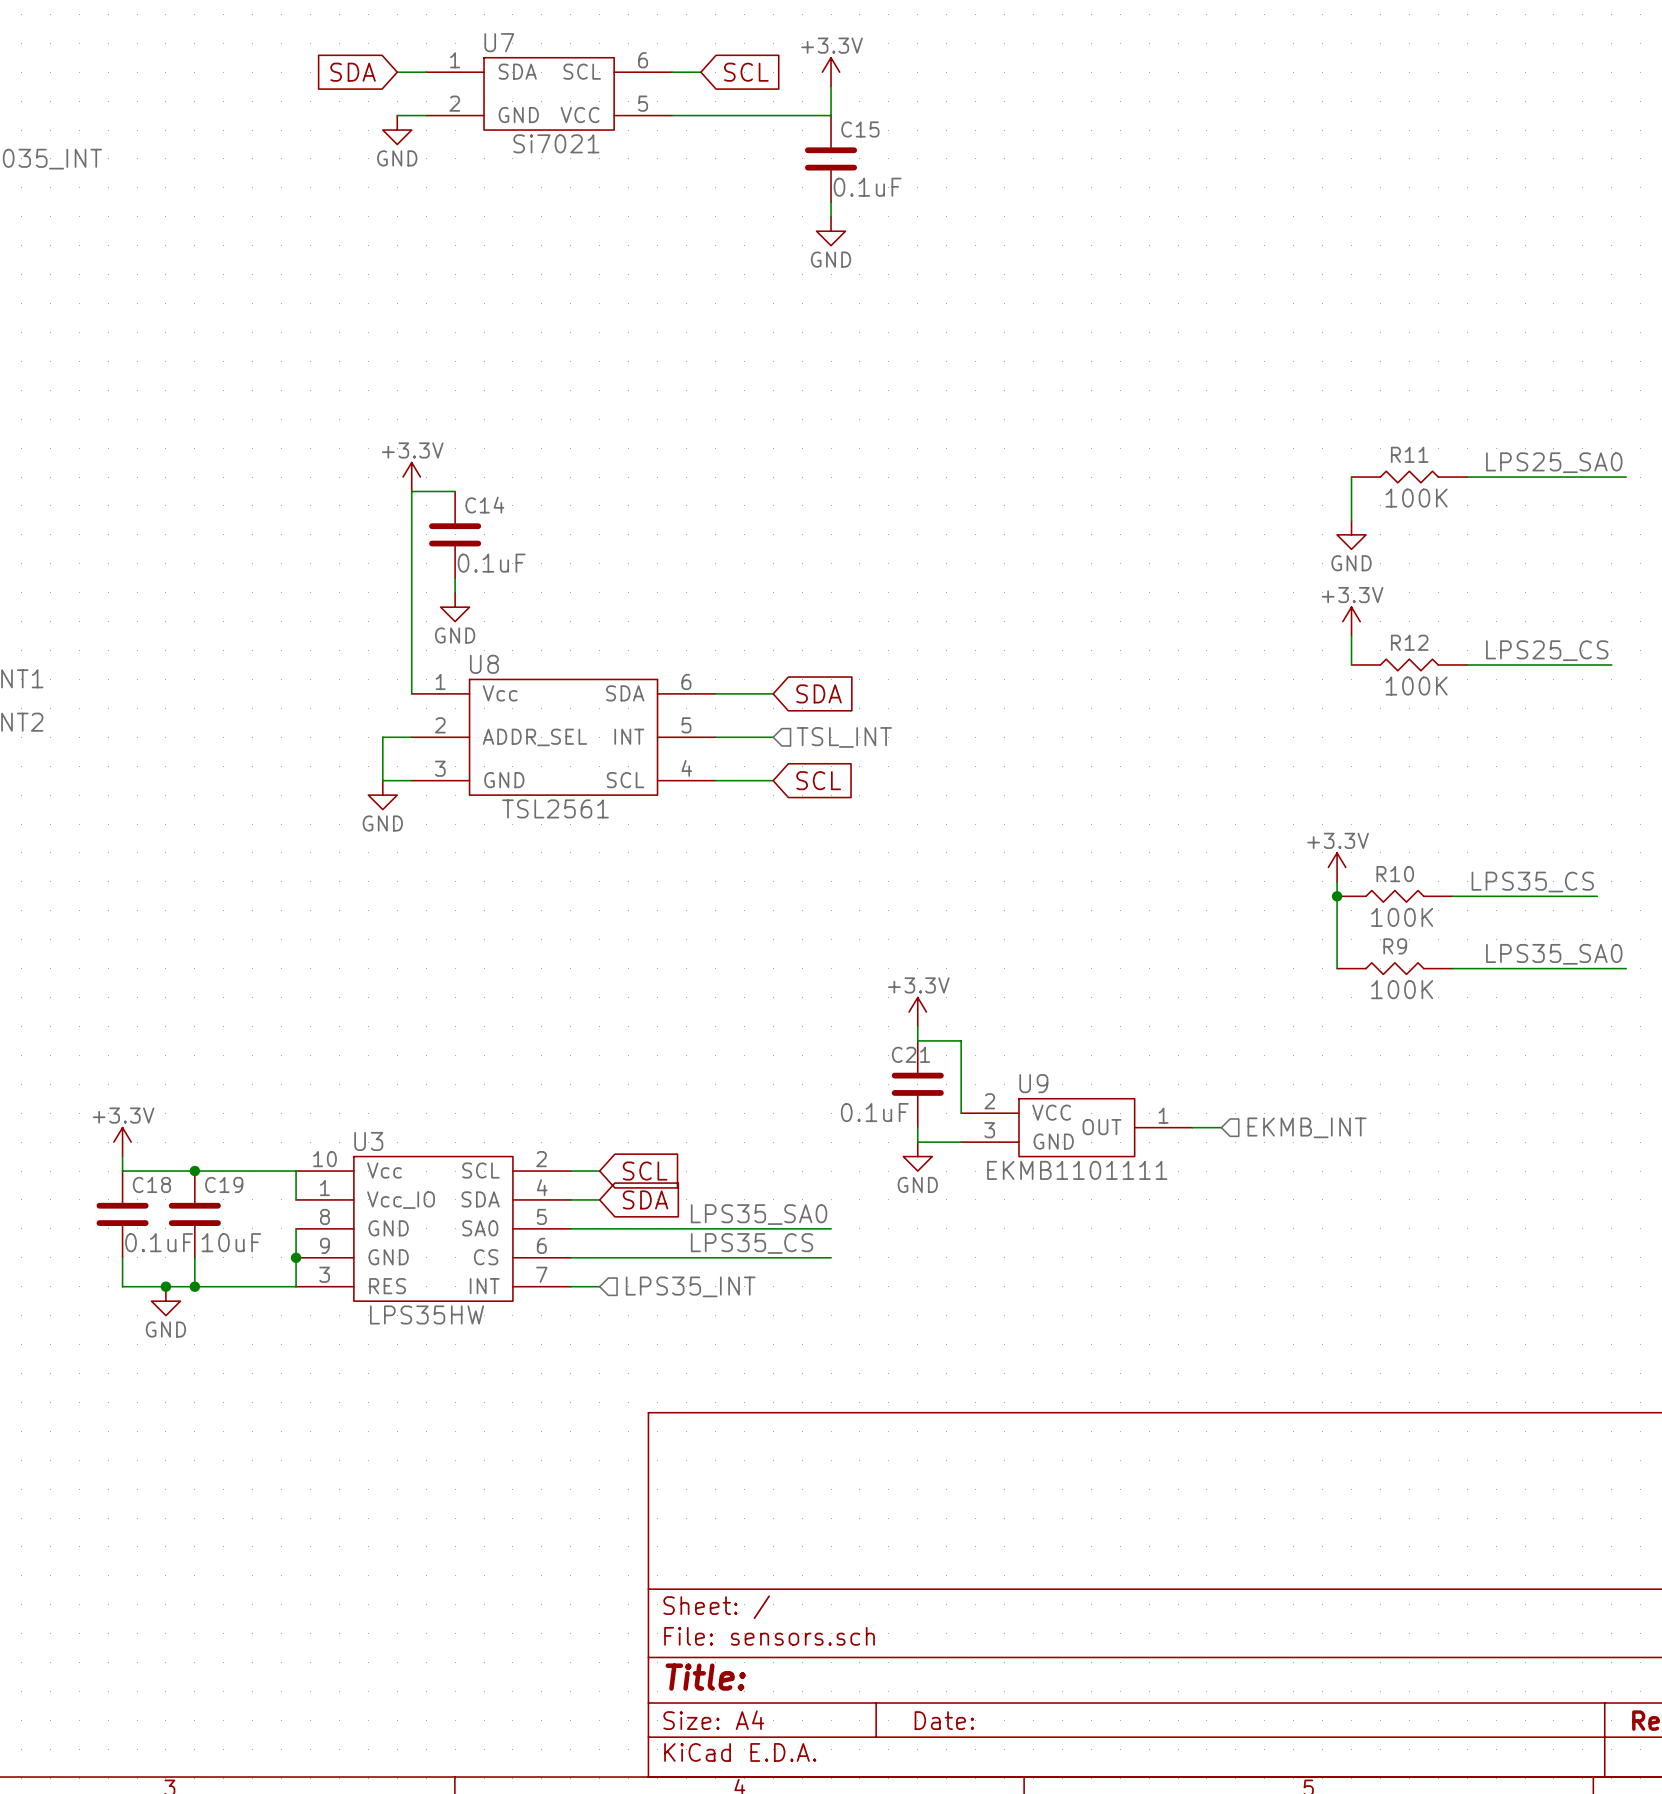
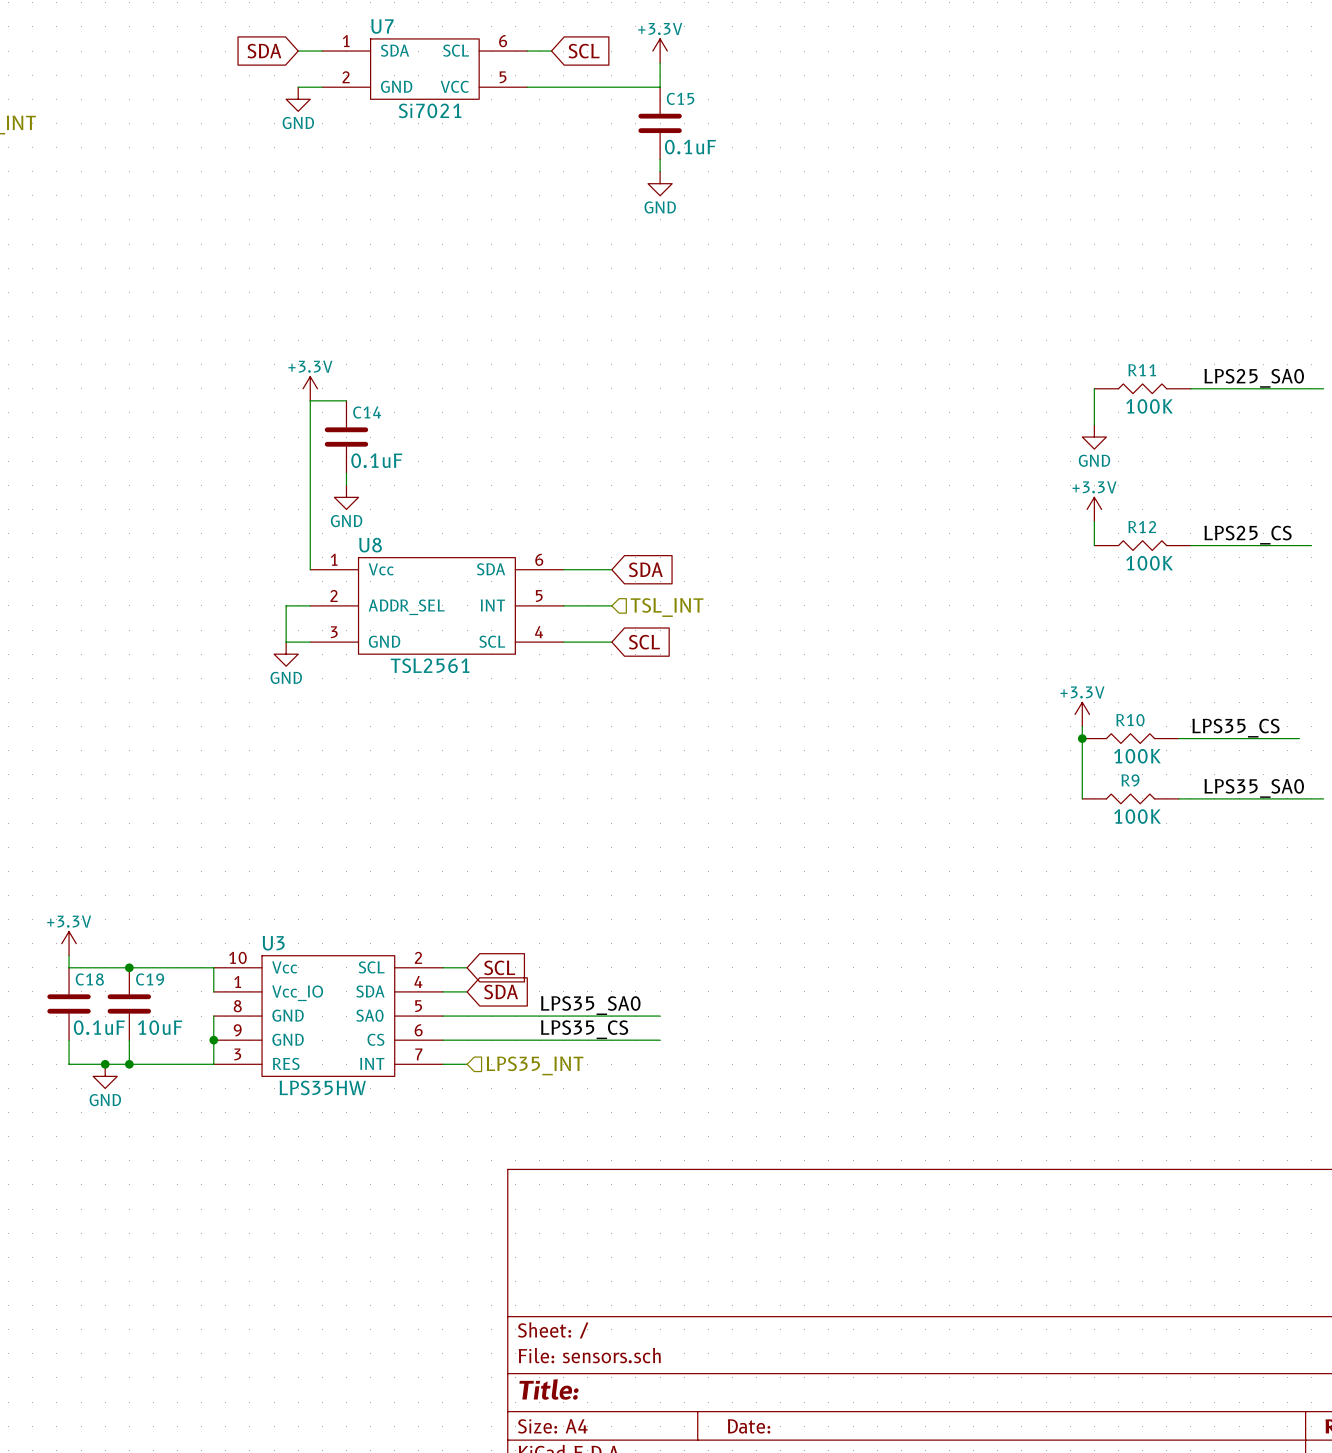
power symbol: +3.3V (917, 1011) -> none
wire: (917, 1026) (917, 1040) (961, 1040) (961, 1113) -> none
C21: (917, 1084) -> none
wire: (917, 1127) (917, 1142) (961, 1142) -> none
U9: EKMB1101111 (1076, 1127) -> none
wire: (1192, 1127) (1221, 1127) -> none
hierarchical label: EKMB_INT (1307, 1127) -> none
power symbol: GND (917, 1156) -> none

